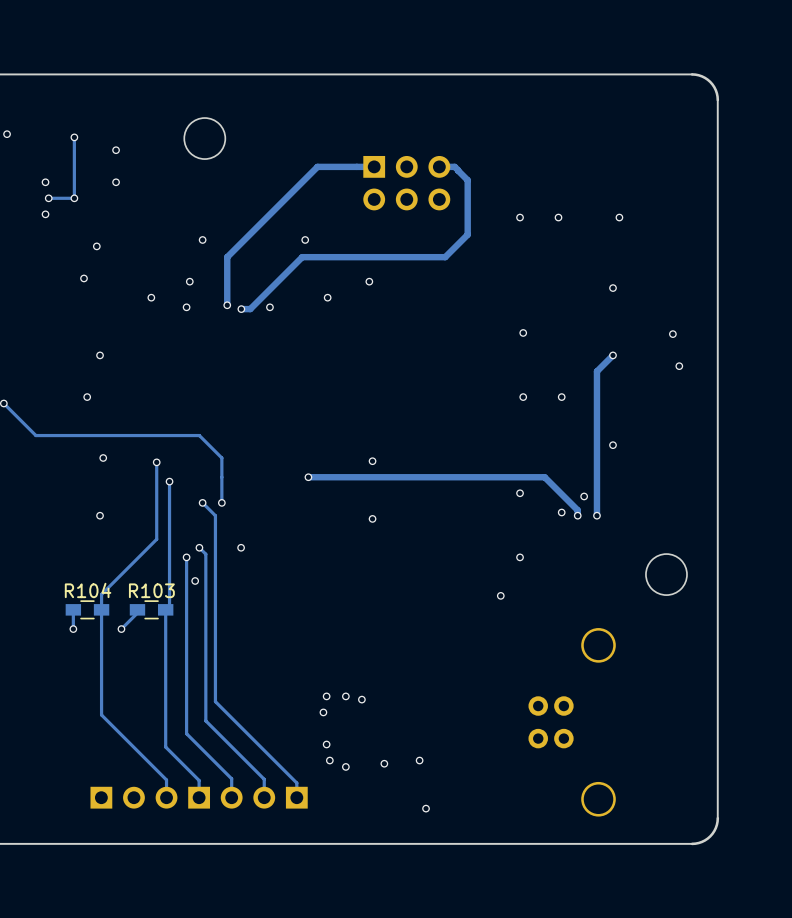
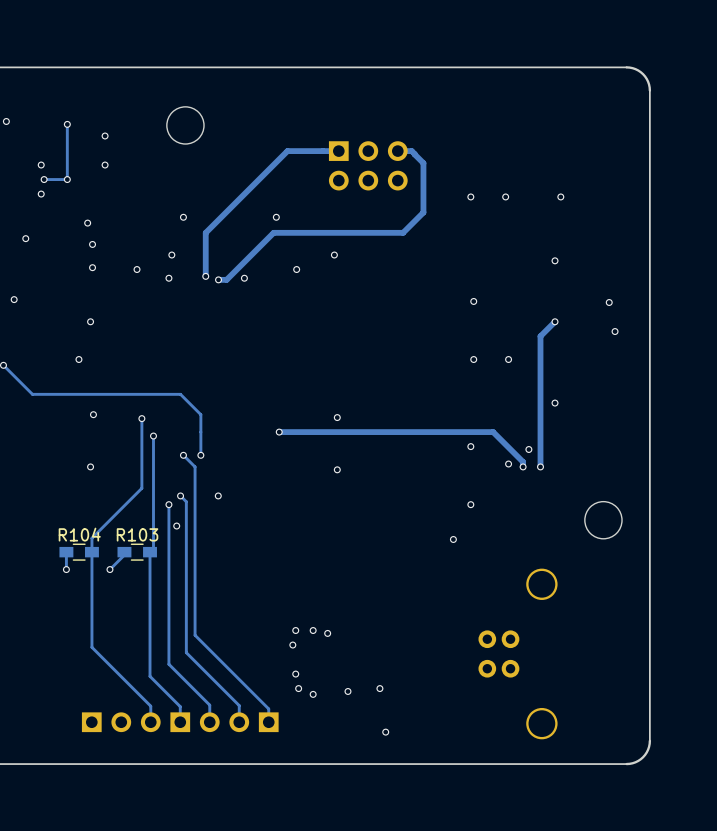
via: none -> (25, 238)
via: none -> (92, 244)
via: (83, 278) -> none
via: none -> (92, 267)
via: none -> (14, 299)

